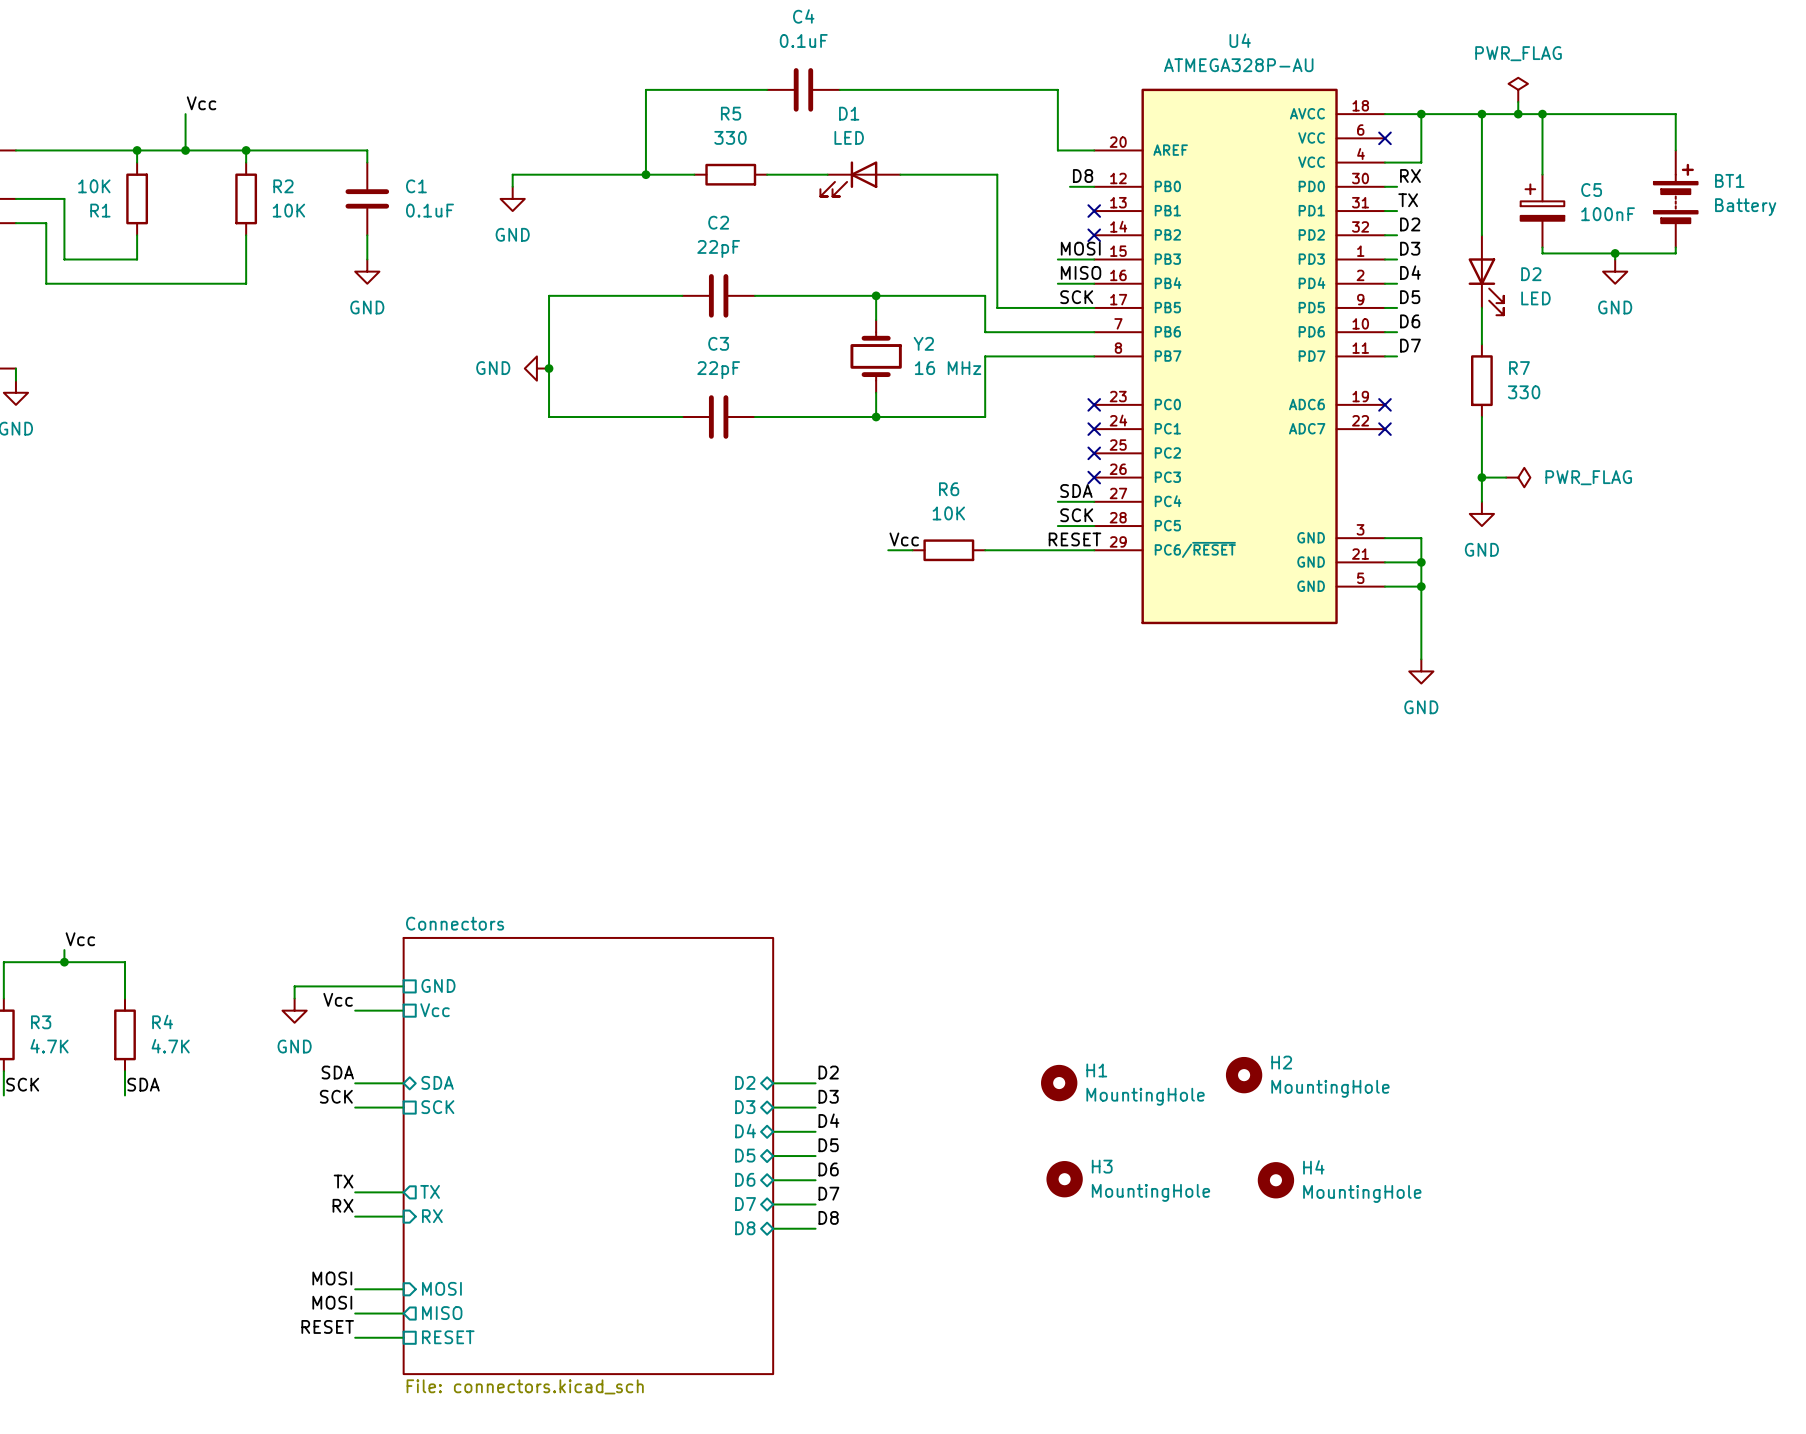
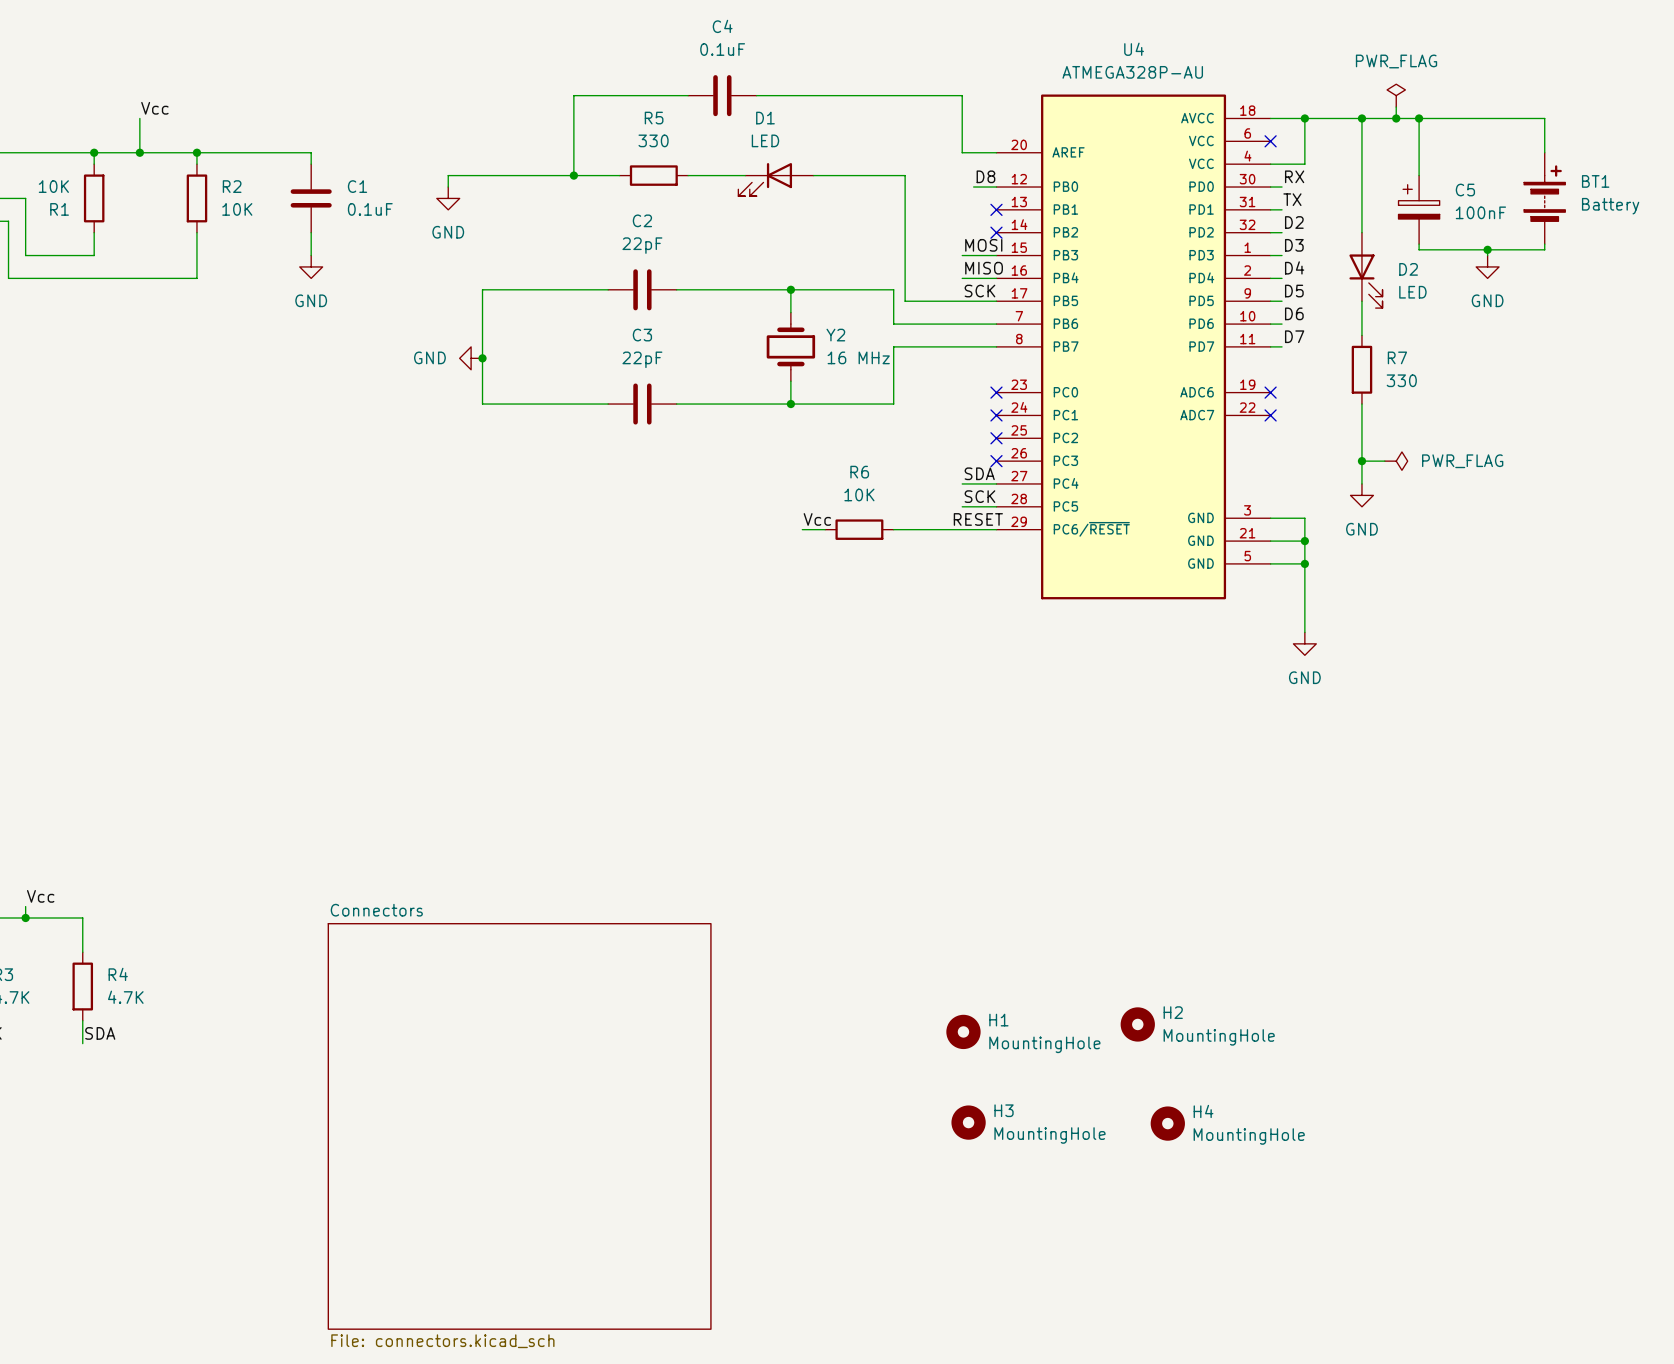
sheet pin: GND (438, 985) -> none
wire: (403, 986) (294, 986) (294, 998) -> none
label: Vcc (338, 999) -> none
power symbol: GND (294, 1010) -> none
wire: (355, 1010) (403, 1010) -> none
sheet pin: Vcc (434, 1010) -> none
label: SDA (337, 1072) -> none
label: D2 (828, 1072) -> none
sheet pin: SDA (437, 1082) -> none
sheet pin: D2 (745, 1082) -> none
wire: (355, 1083) (403, 1083) -> none
wire: (773, 1083) (815, 1083) -> none
label: SCK (336, 1096) -> none
label: D3 (828, 1096) -> none
wire: (355, 1107) (403, 1107) -> none
sheet pin: SCK (437, 1107) -> none
sheet pin: D3 (745, 1107) -> none
wire: (773, 1107) (815, 1107) -> none
label: D4 (828, 1120) -> none
sheet pin: D4 (745, 1131) -> none
wire: (773, 1131) (815, 1131) -> none
label: D5 (828, 1145) -> none
sheet pin: D5 (745, 1155) -> none
sheet Connectors: File: connectors.kicad_sch (588, 1156) -> none
wire: (773, 1156) (815, 1156) -> none
label: D6 (828, 1169) -> none
sheet pin: D6 (745, 1179) -> none
wire: (773, 1180) (815, 1180) -> none
label: TX (343, 1181) -> none
sheet Connectors: none -> File: connectors.kicad_sch (519, 1126)
sheet pin: TX (430, 1191) -> none
wire: (355, 1192) (403, 1192) -> none
label: D7 (828, 1193) -> none
sheet pin: D7 (745, 1204) -> none
wire: (773, 1204) (815, 1204) -> none
label: RX (342, 1205) -> none
wire: (355, 1216) (403, 1216) -> none
sheet pin: RX (432, 1216) -> none
label: D8 (828, 1217) -> none
sheet pin: D8 (745, 1228) -> none
wire: (773, 1228) (815, 1228) -> none
label: MOSI (332, 1278) -> none
sheet pin: MOSI (441, 1288) -> none
wire: (355, 1289) (403, 1289) -> none
label: MOSI (332, 1302) -> none
wire: (355, 1313) (403, 1313) -> none
sheet pin: MISO (442, 1313) -> none
label: RESET (327, 1326) -> none
wire: (355, 1337) (403, 1337) -> none
sheet pin: RESET (448, 1337) -> none

